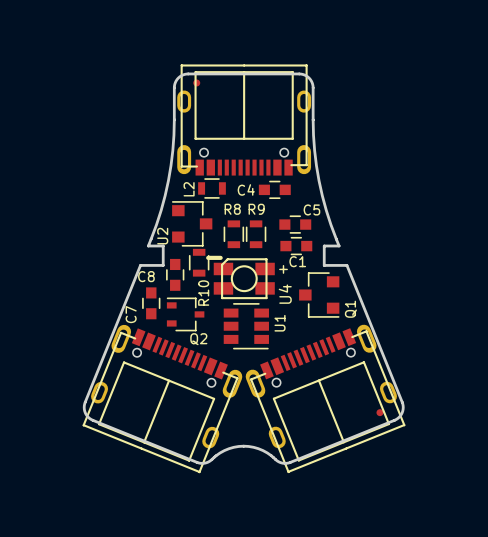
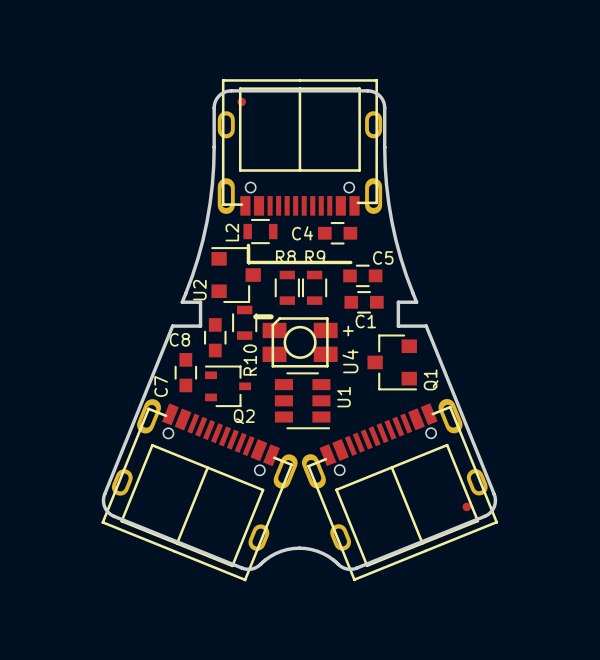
line: none -> (248, 245) (248, 262) (350, 262)

